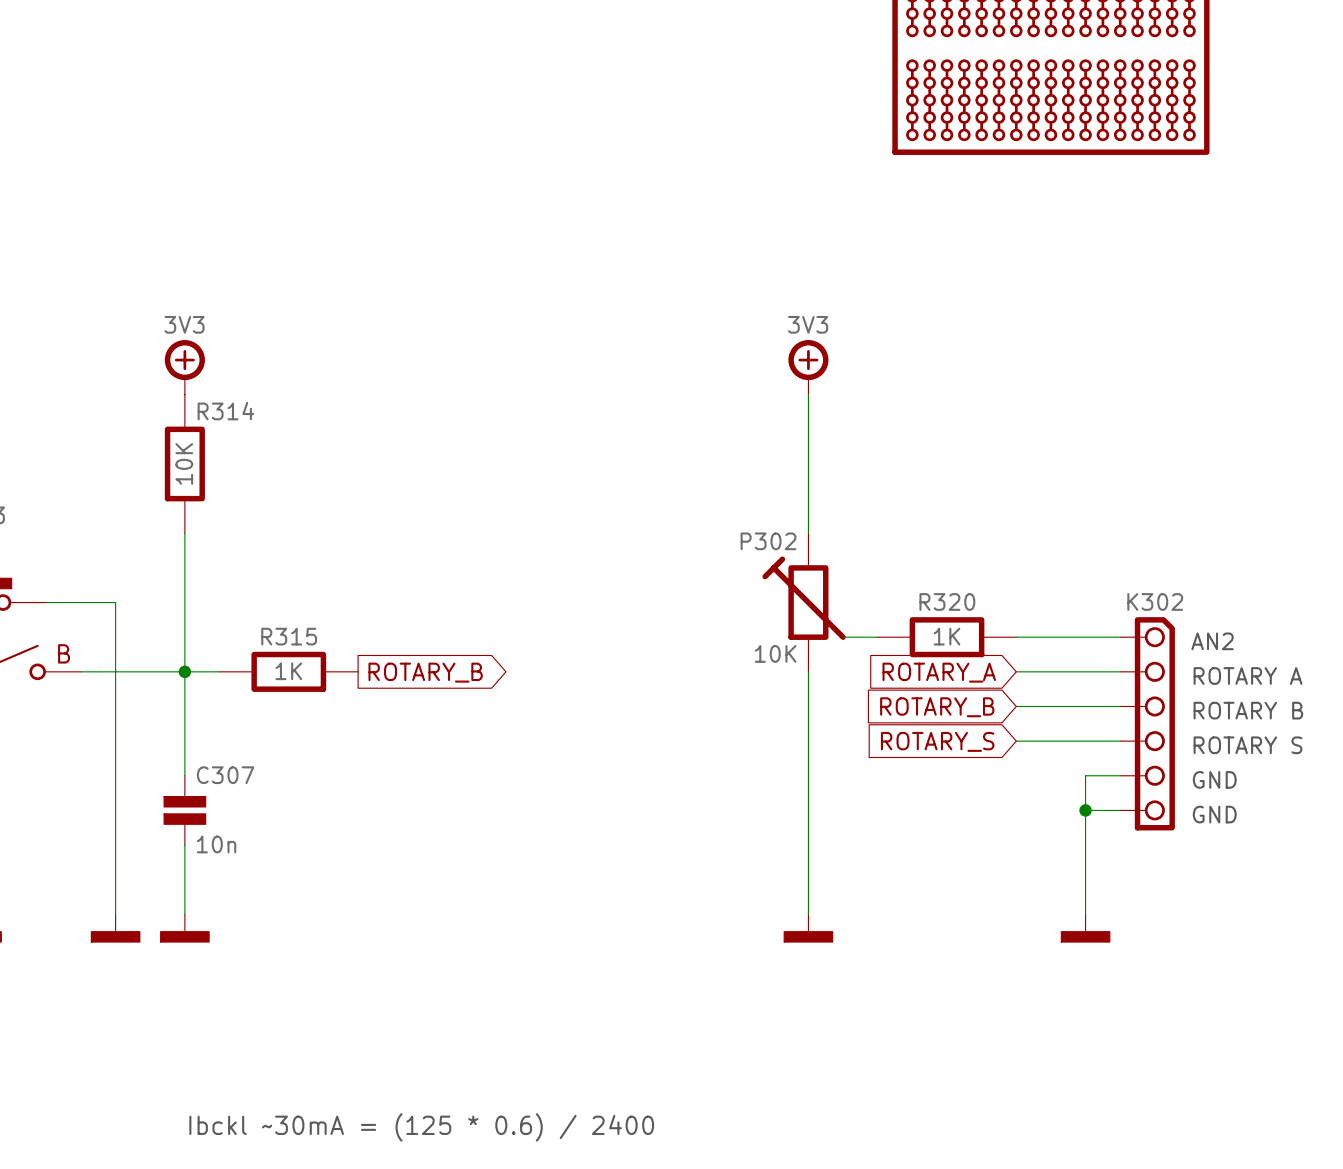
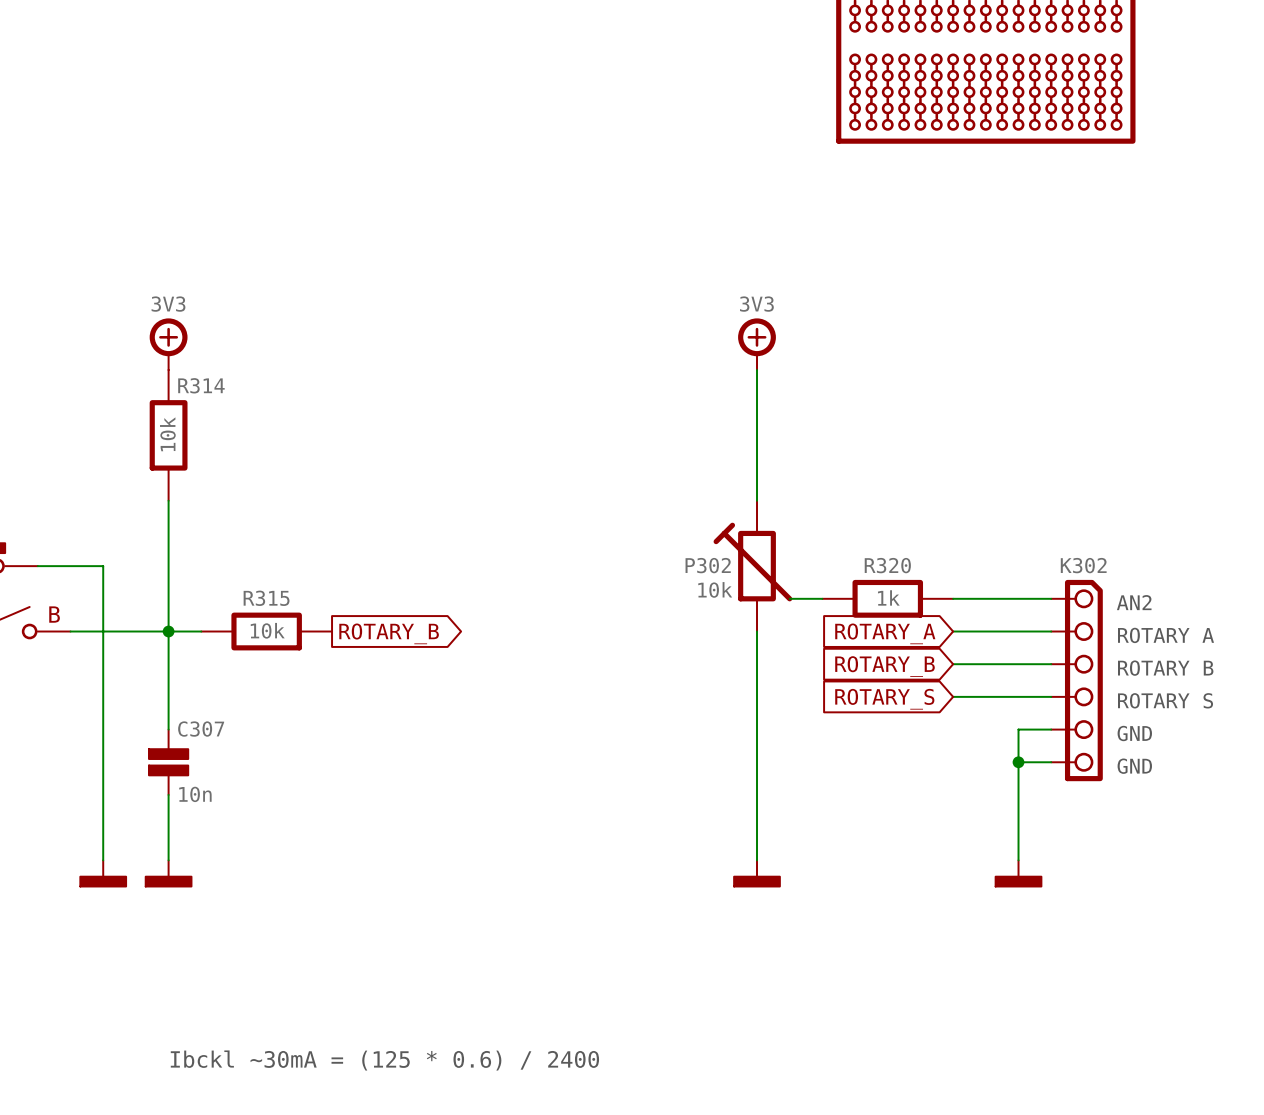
R314 value: 10K (184, 463) -> 10k (167, 434)
P302 name position: P302 (768, 541) -> P302 (708, 565)
R320 value: 1K (947, 636) -> 1k (888, 597)
P302 value: 10K (775, 653) -> 10k (715, 589)
R315 value: 1K (288, 671) -> 10k (267, 630)

